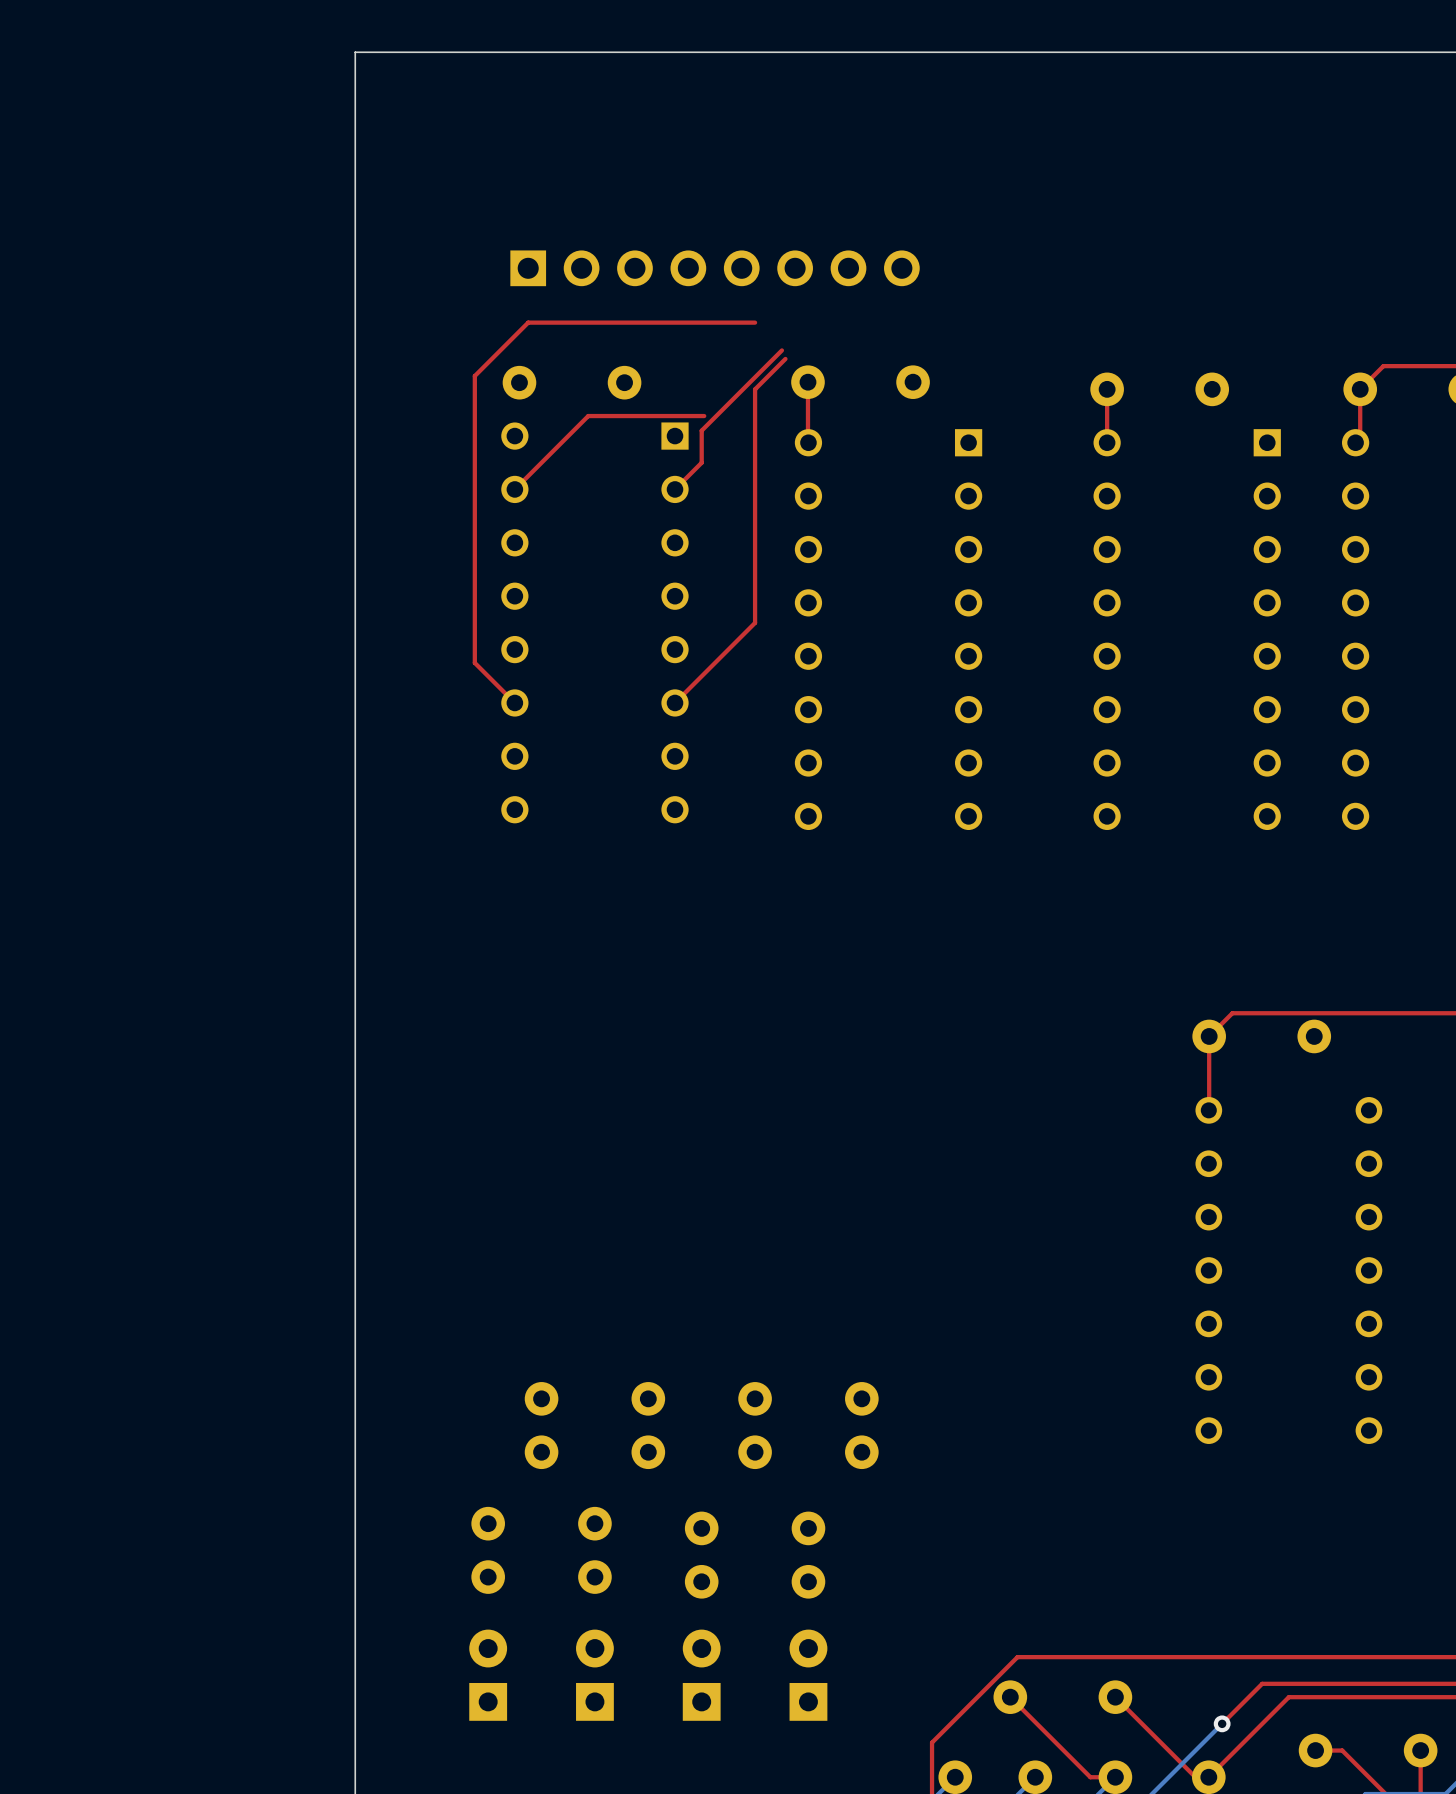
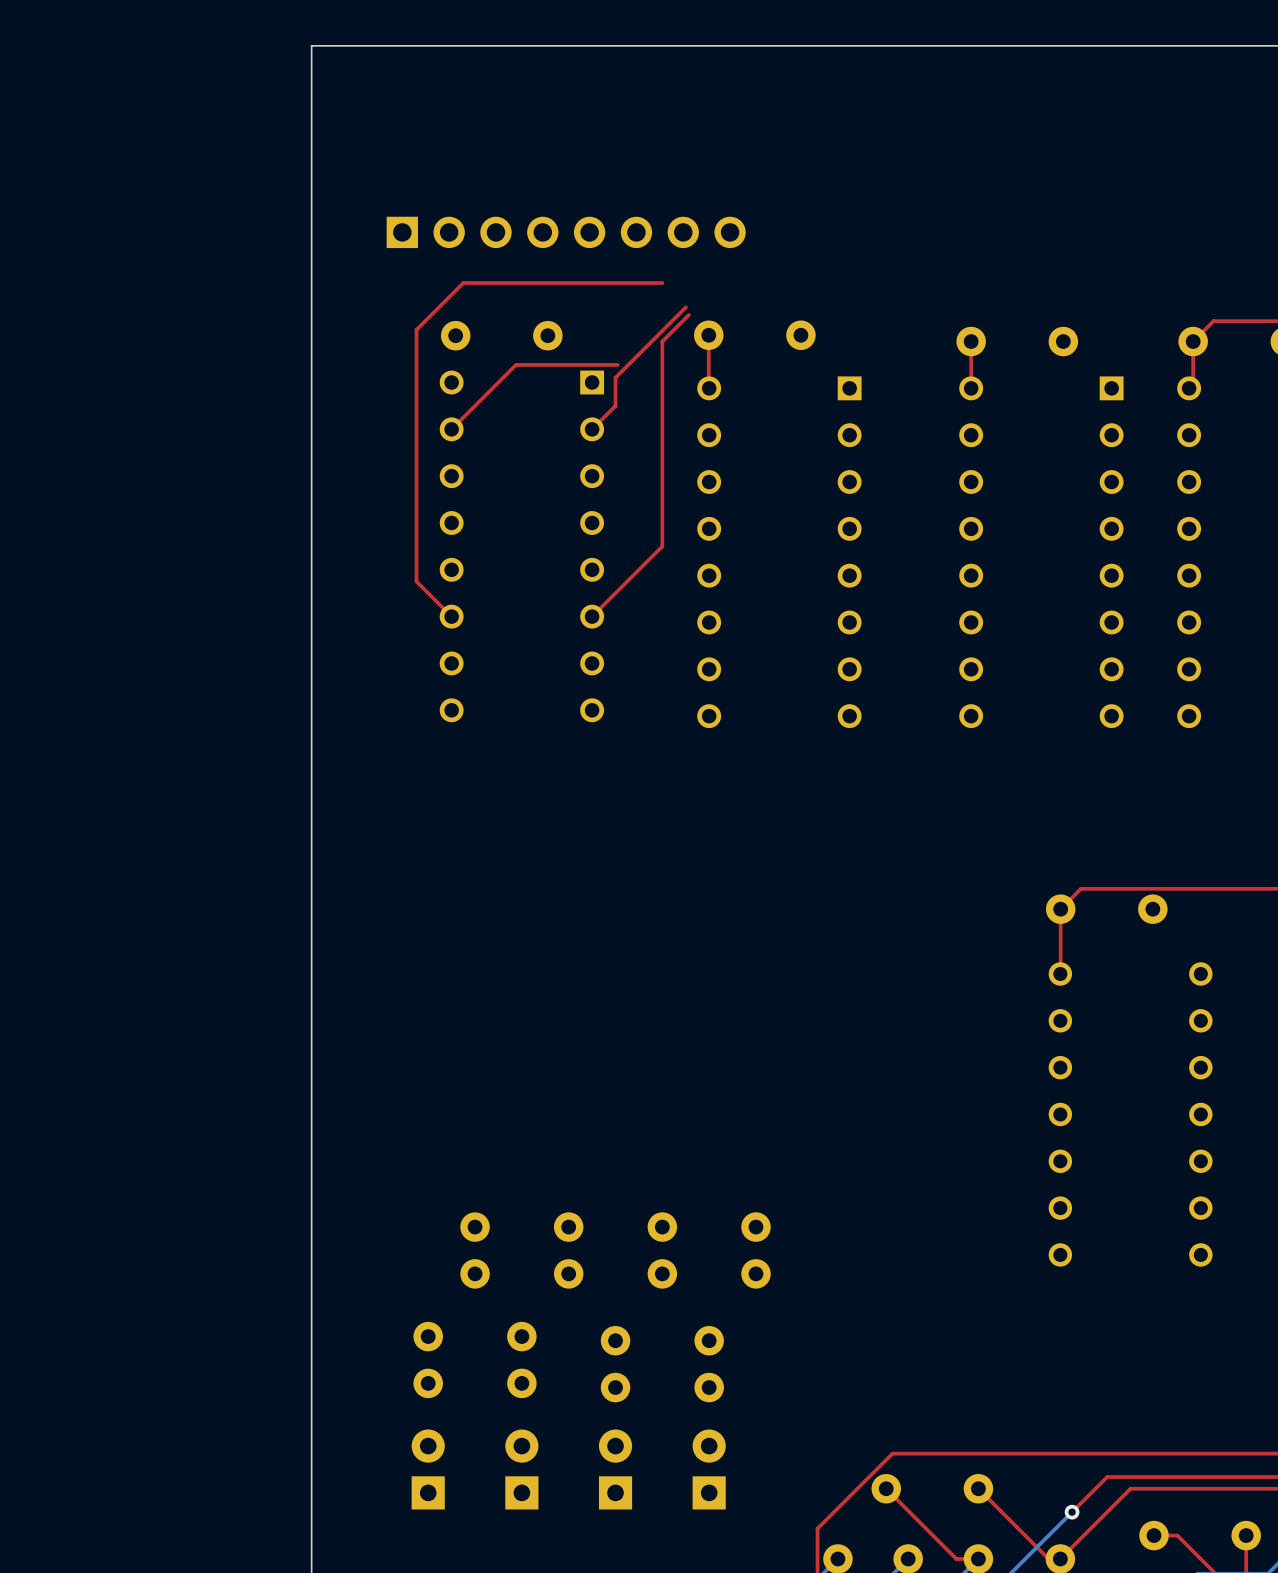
part position: (715, 268) -> (566, 232)

